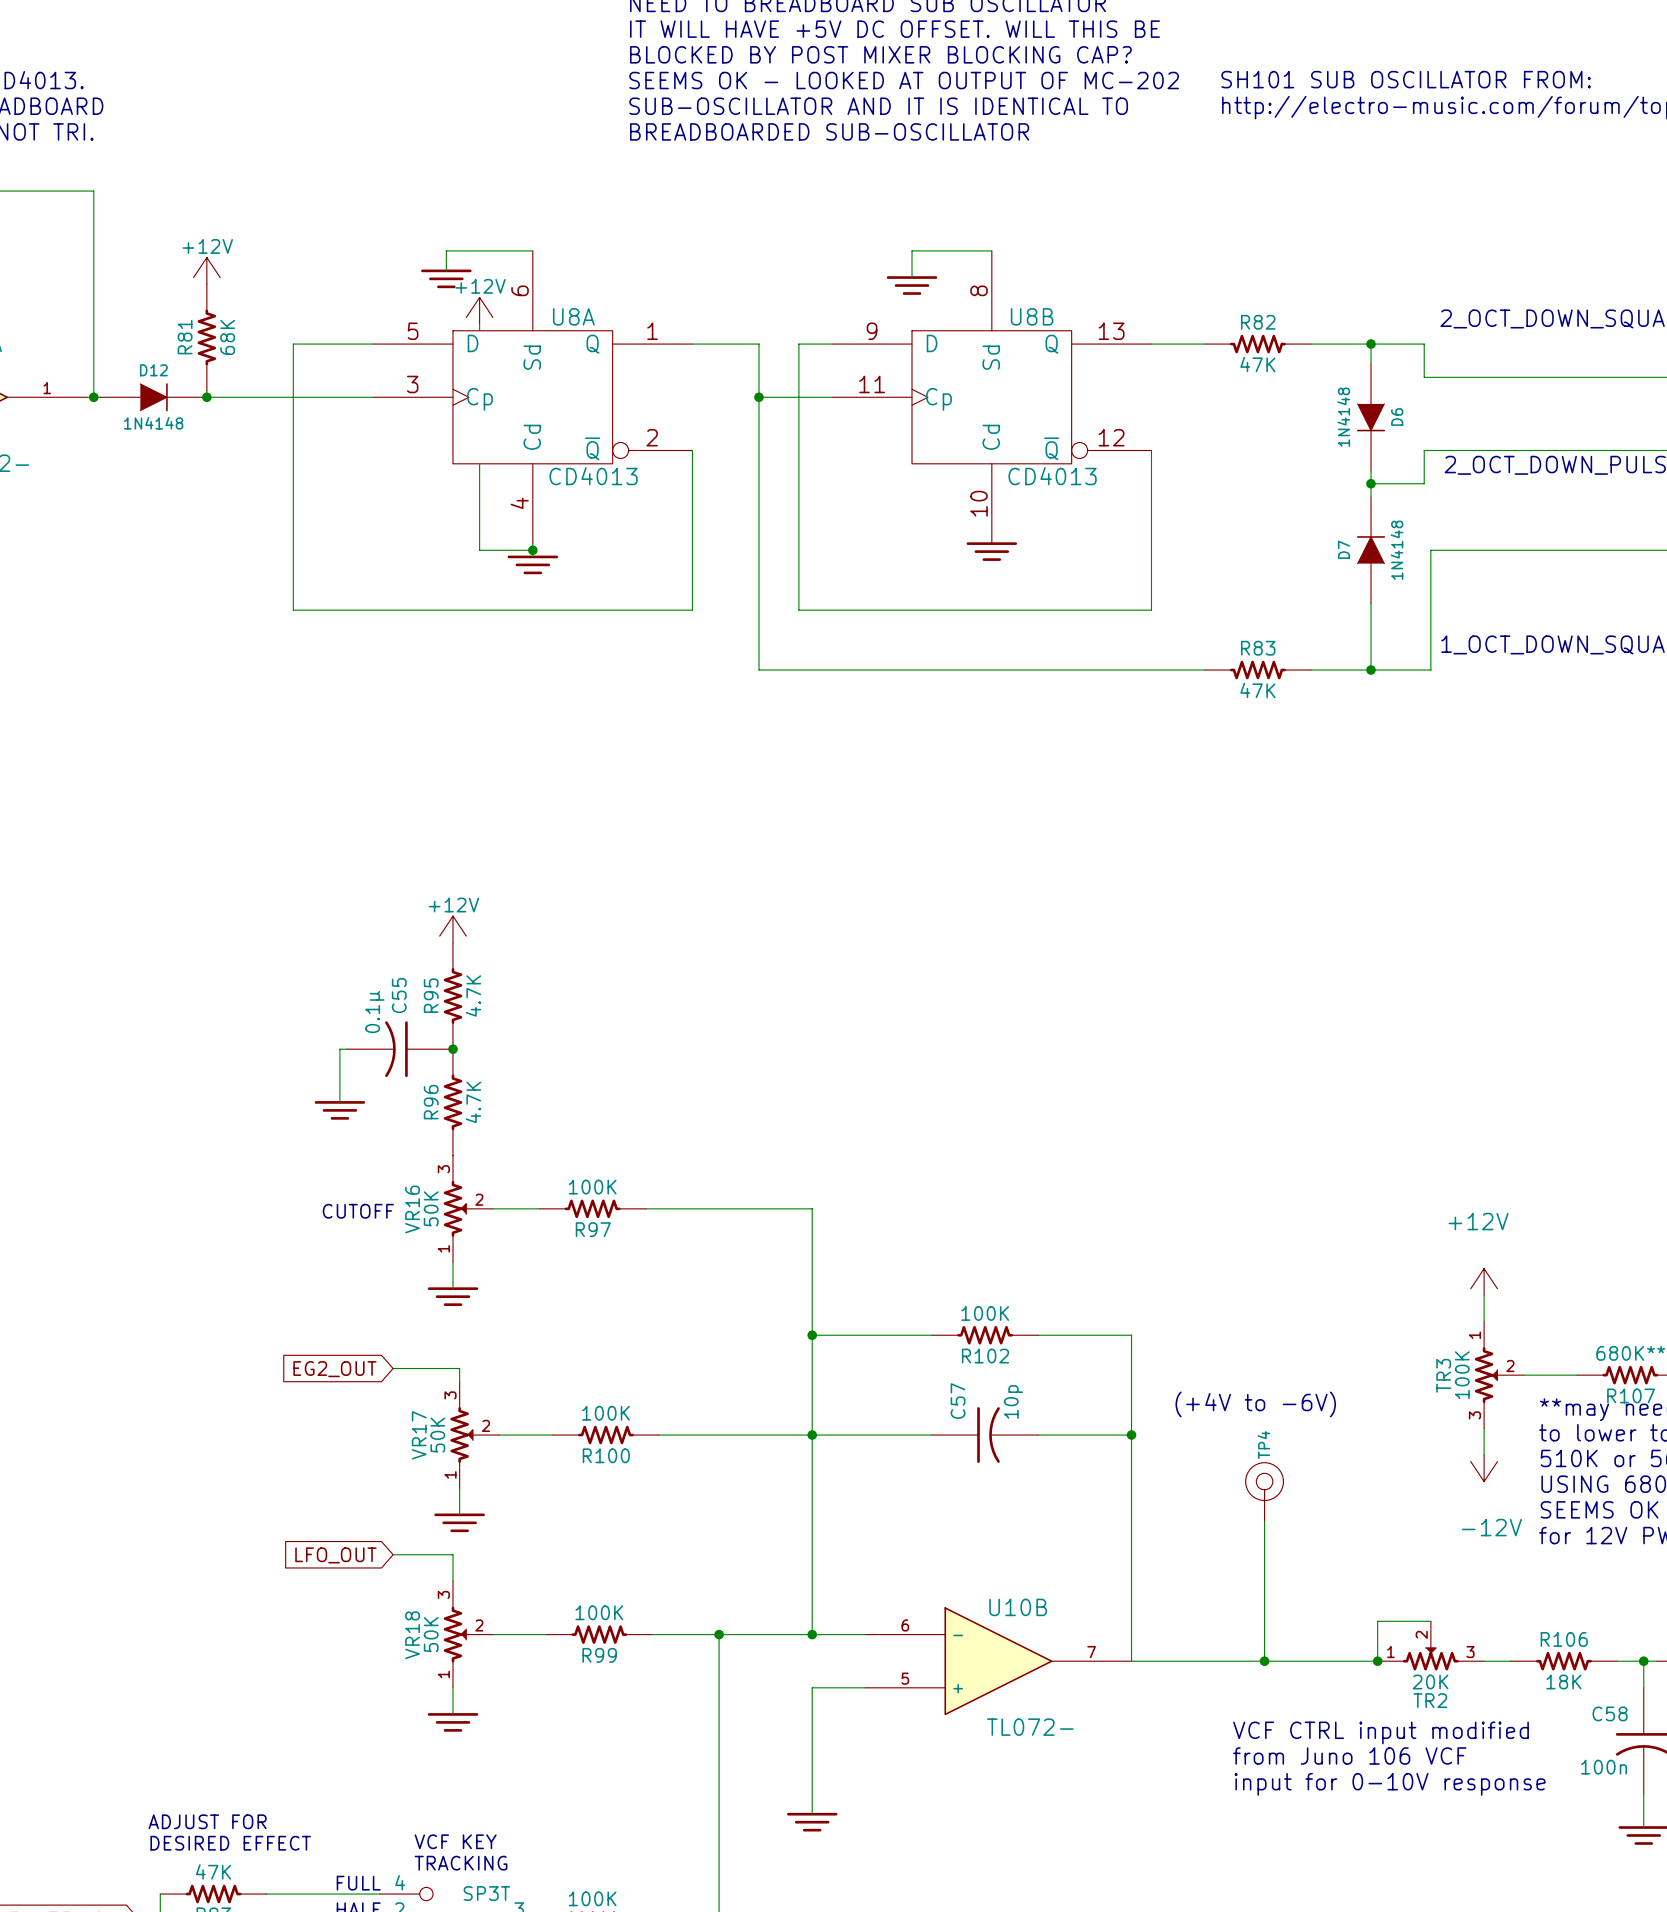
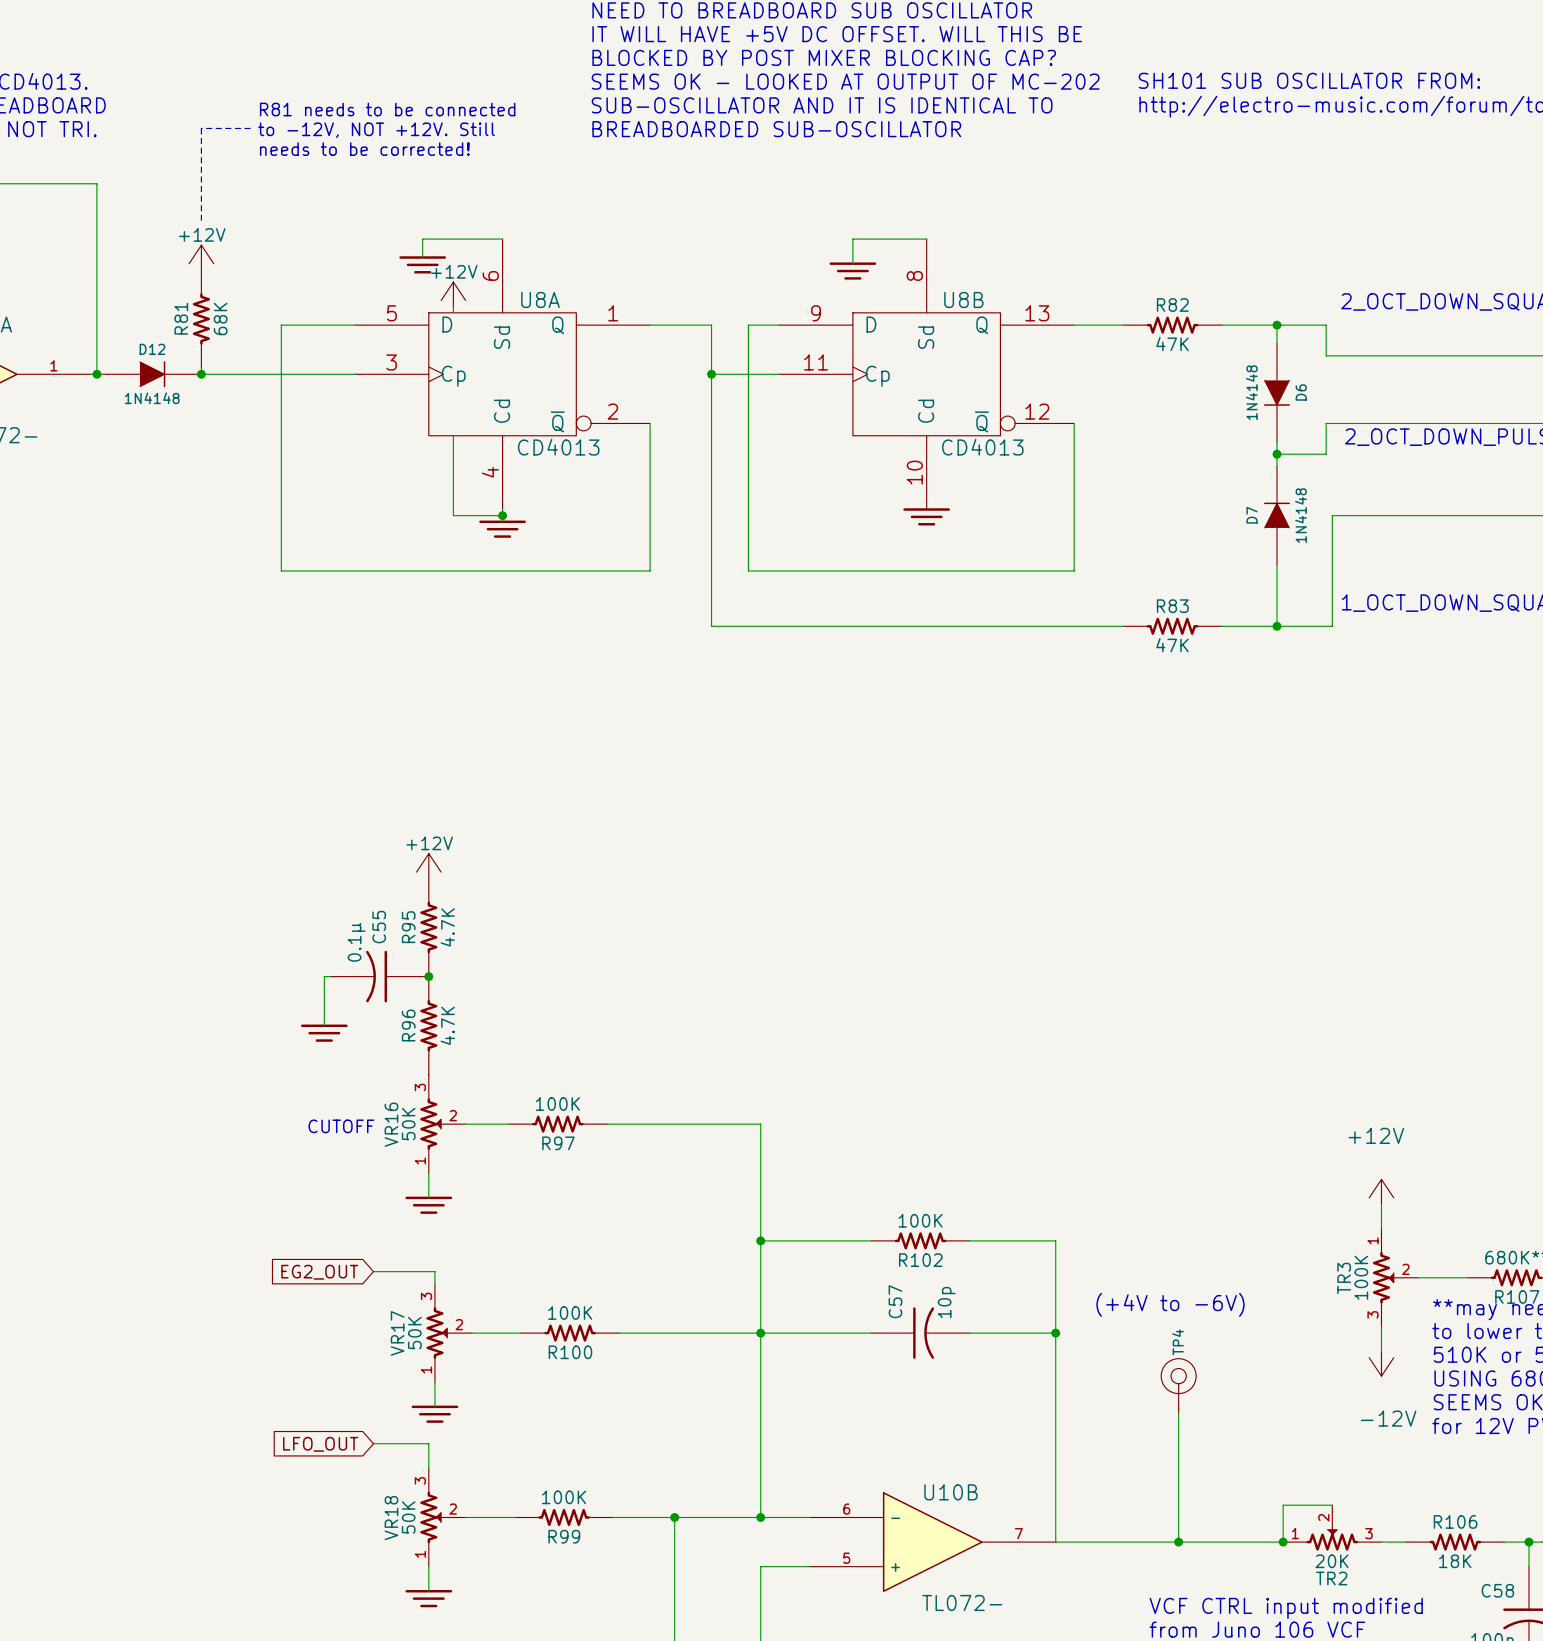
text: none -> R81 needs to be connected (387, 109)
line: none -> (250, 128) (201, 128) (201, 220)
text: none -> to -12V, NOT +12V. Still (376, 130)
text: none -> needs to be corrected! (364, 149)

